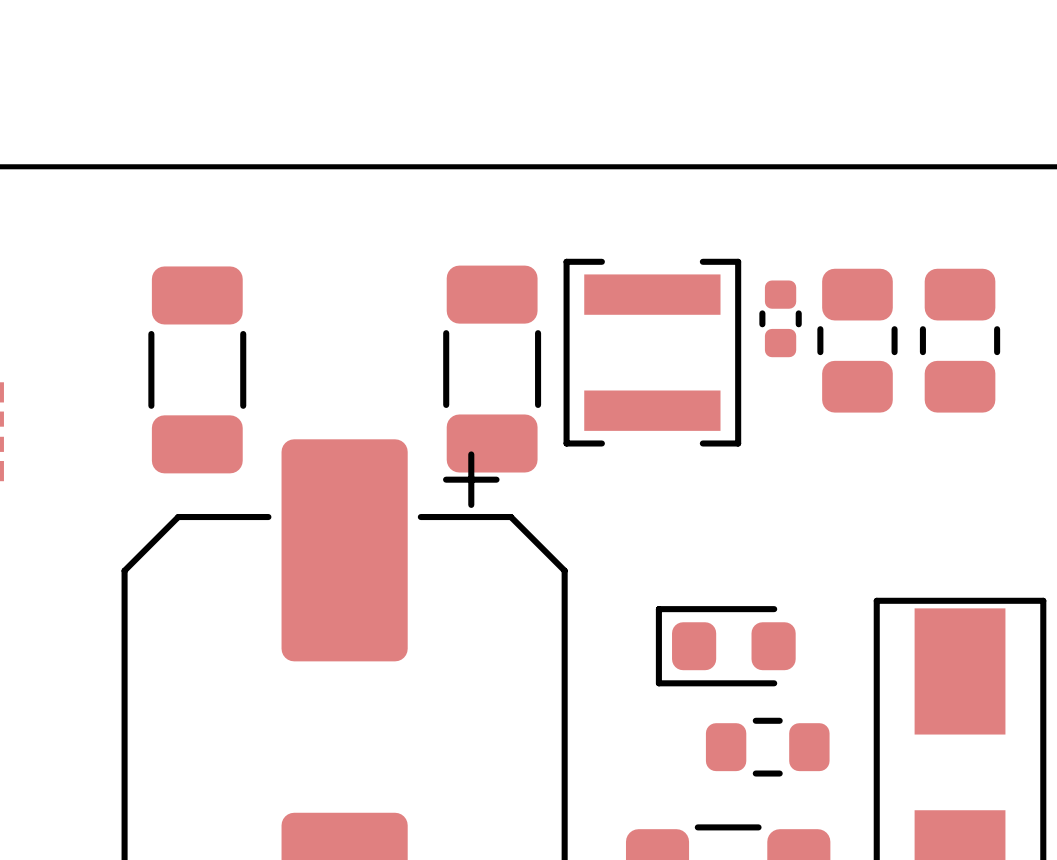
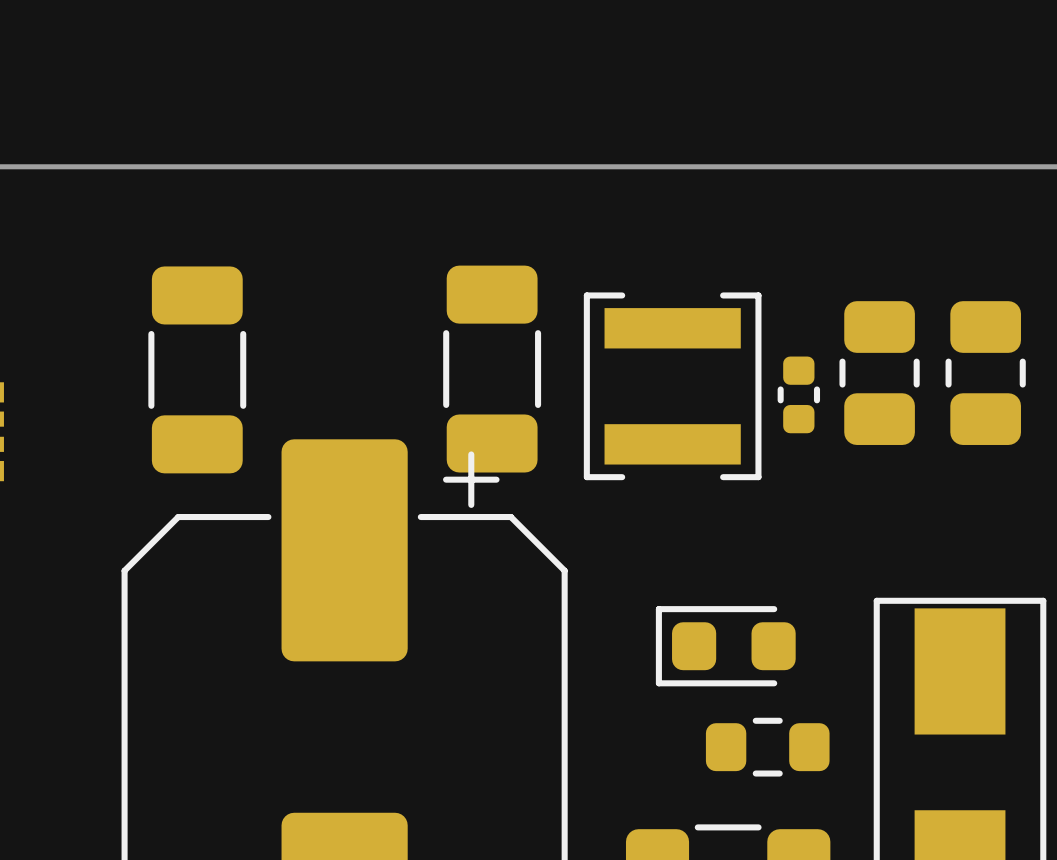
part position: (780, 318) -> (798, 394)
part position: (857, 340) -> (879, 373)
part position: (960, 340) -> (985, 373)
part position: (652, 352) -> (672, 386)

